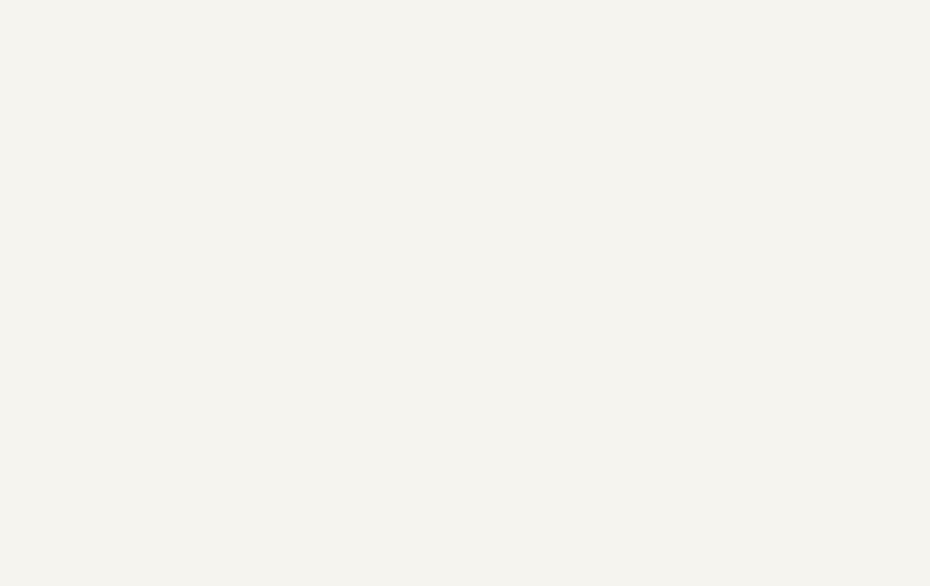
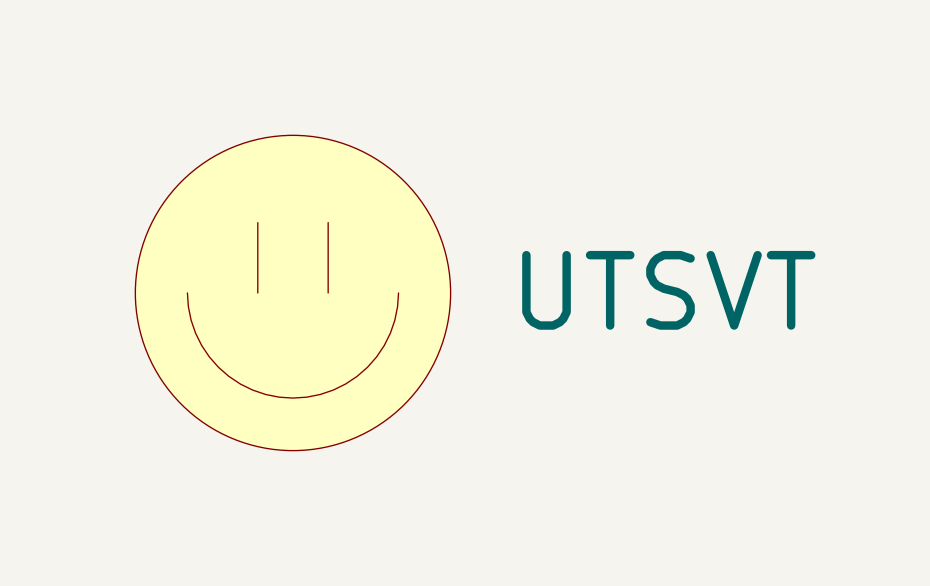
part: none -> UTSVT (292, 292)

